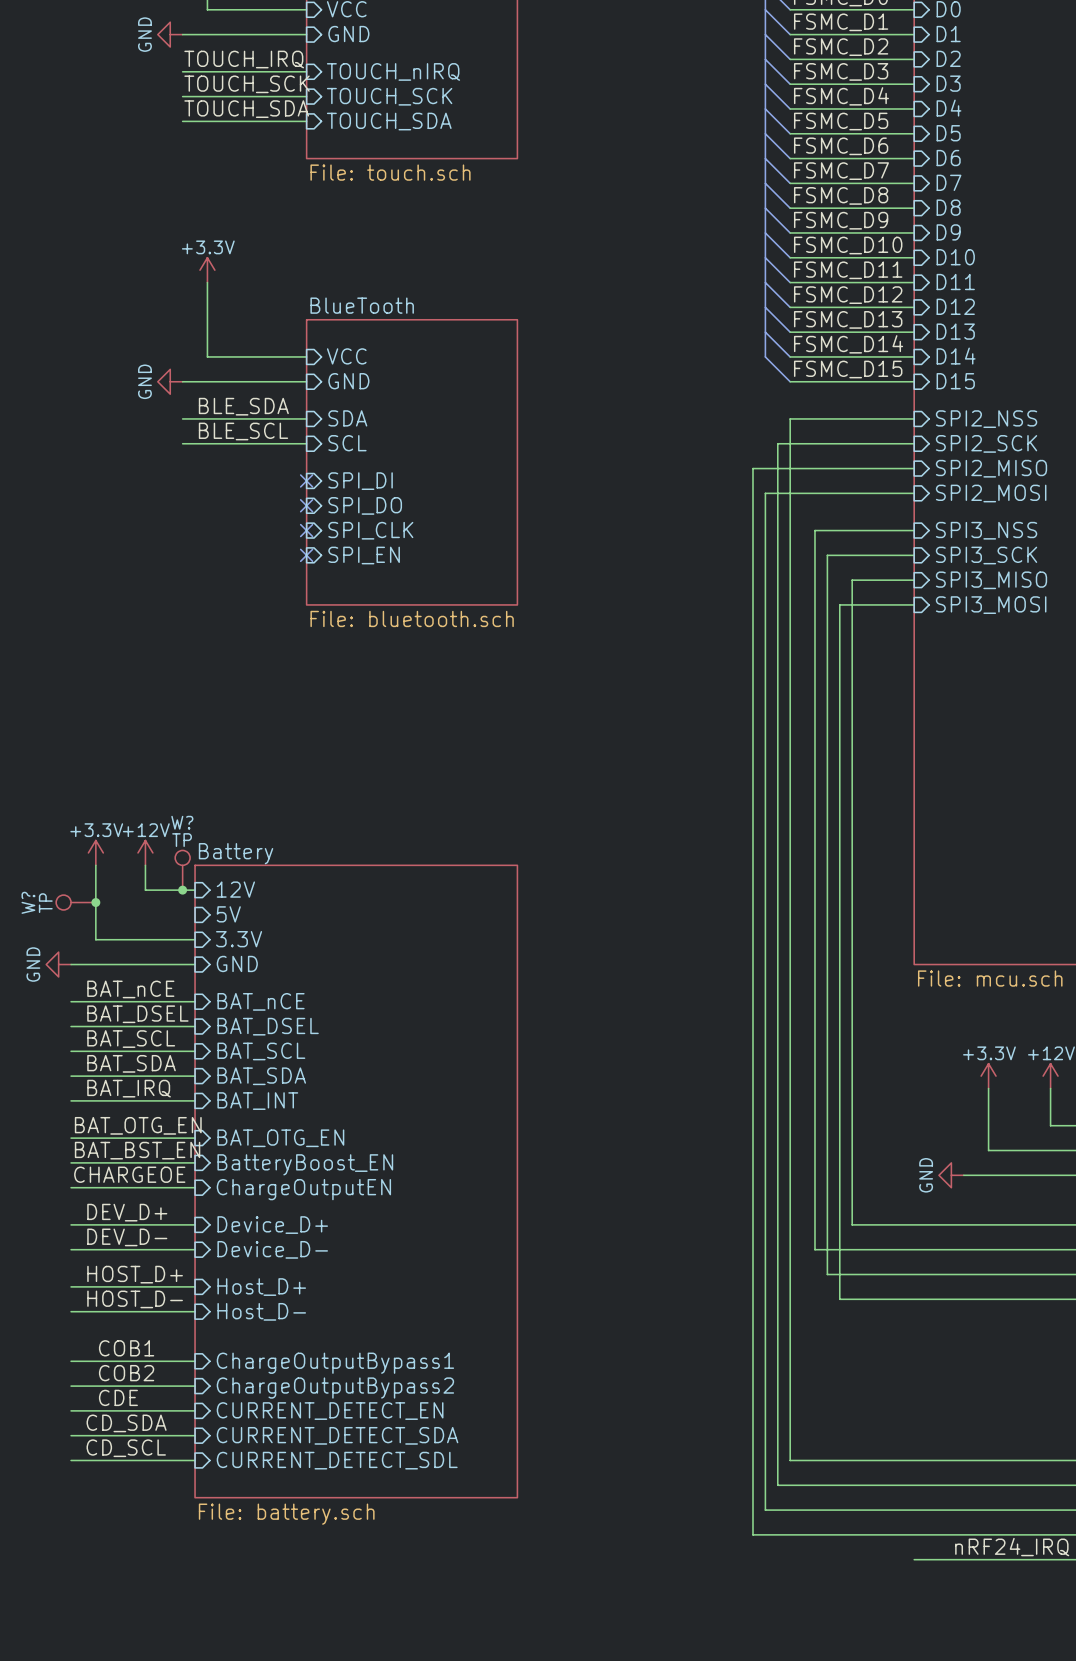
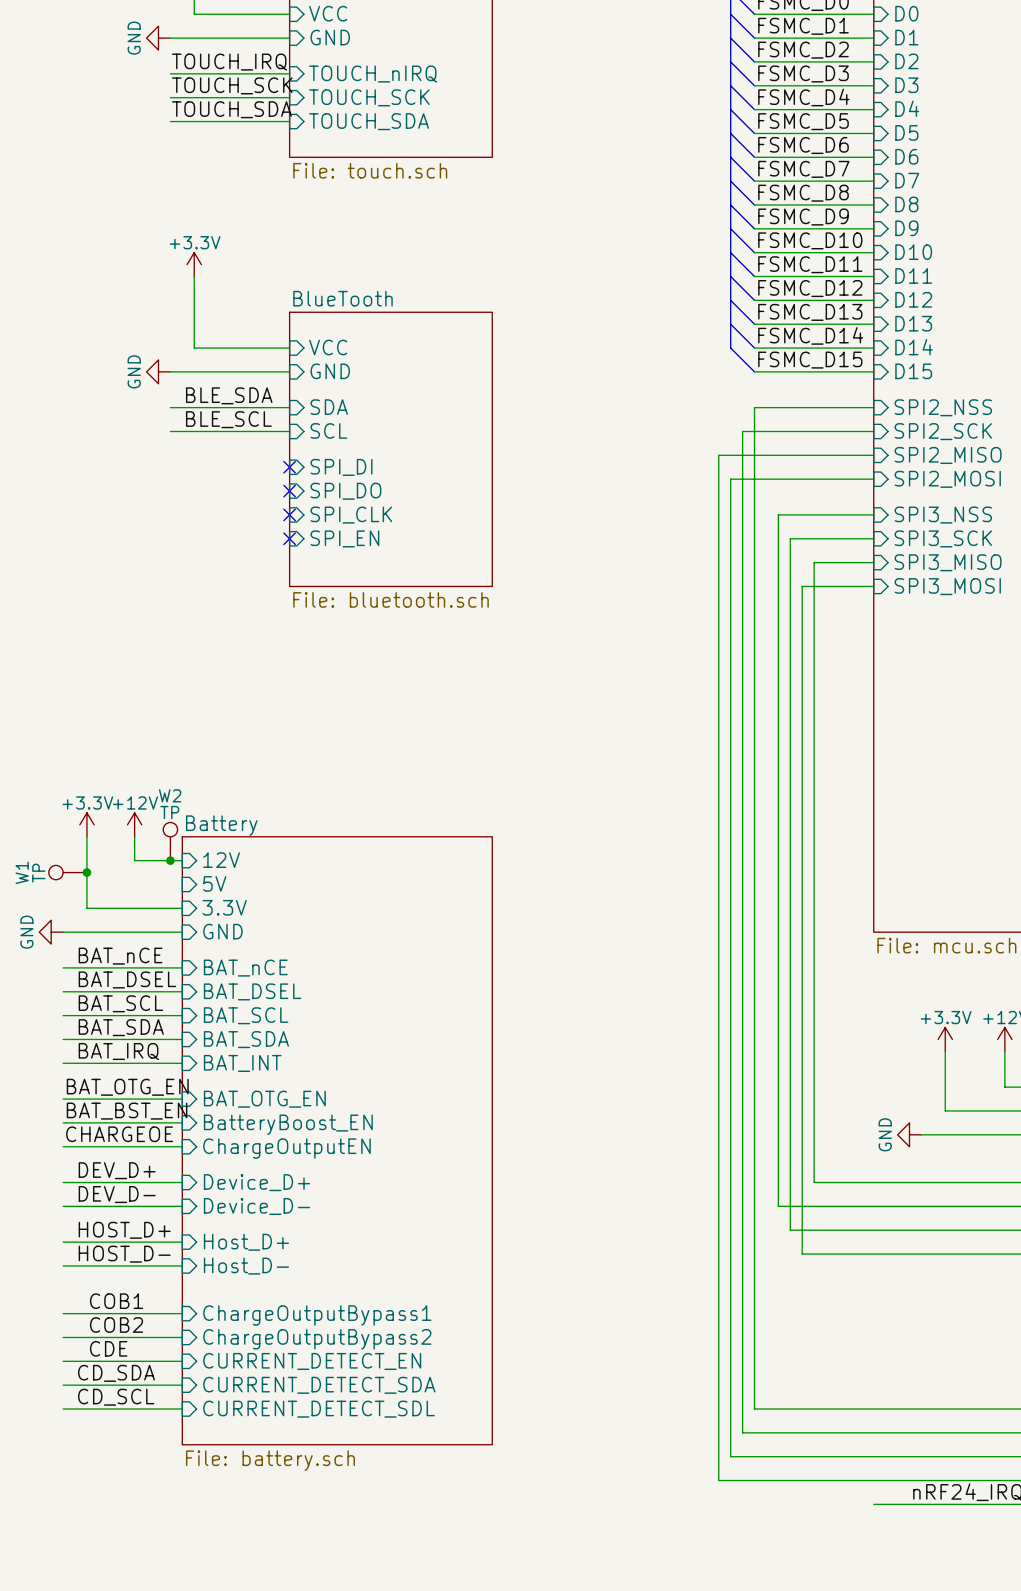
W? name: W? (182, 822) -> W2 (170, 795)
W? name: W? (28, 902) -> W1 (22, 872)

